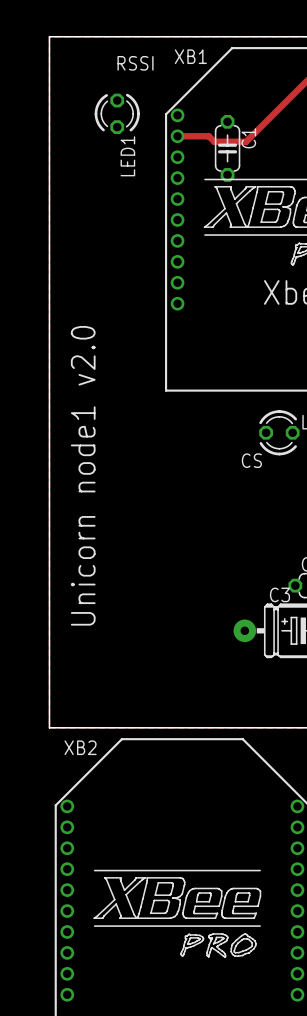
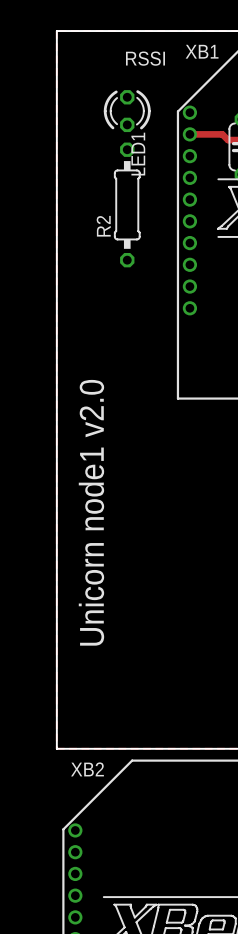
R2: none -> (127, 204)

